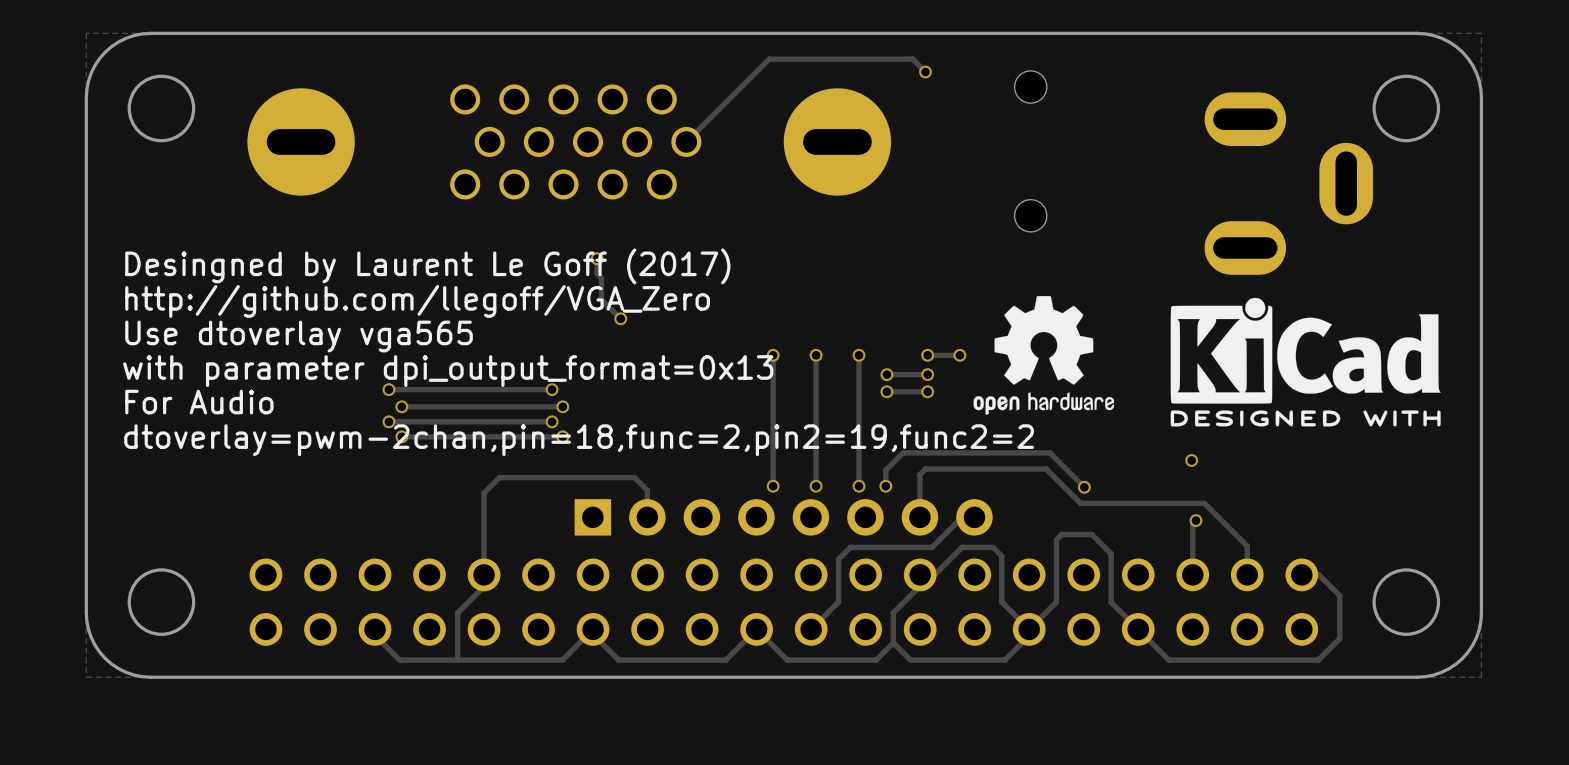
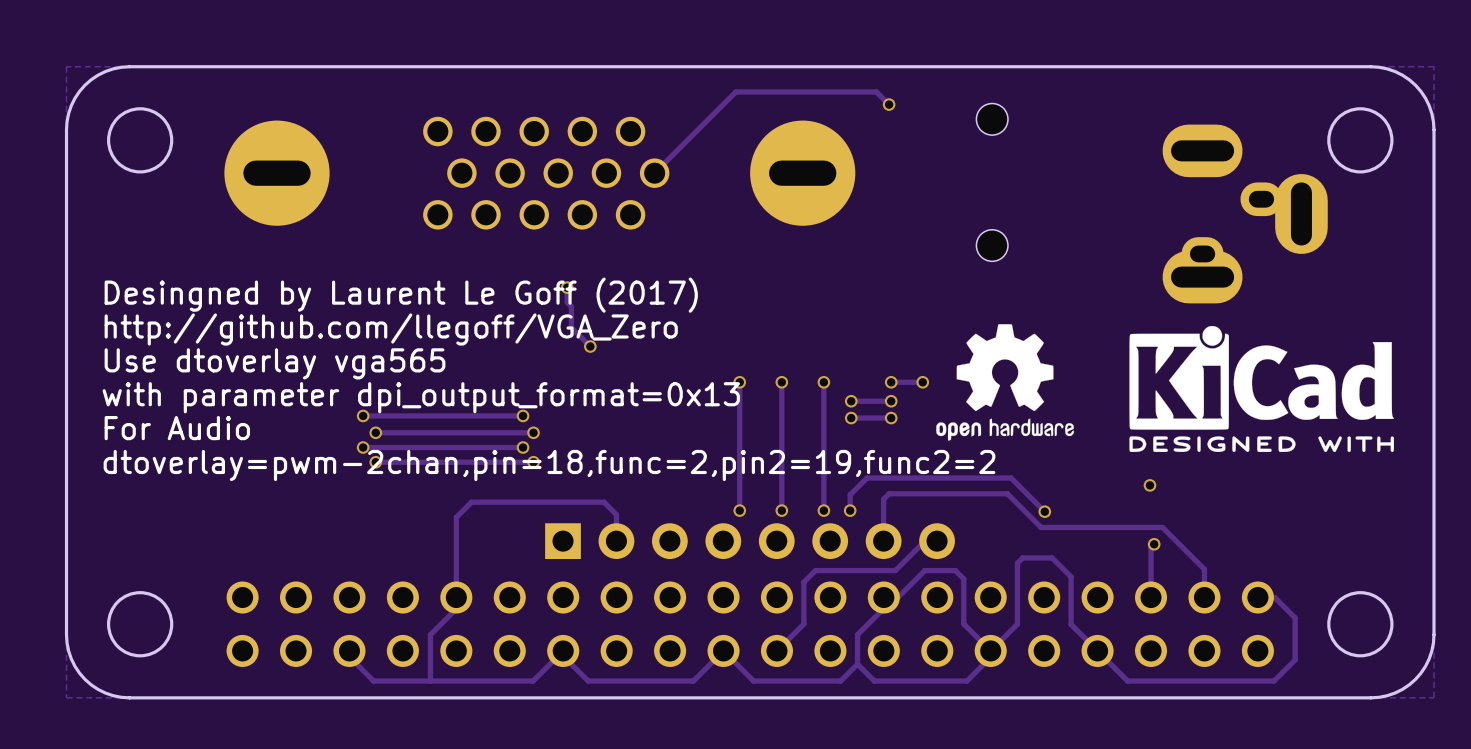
part: none -> (1232, 202)

